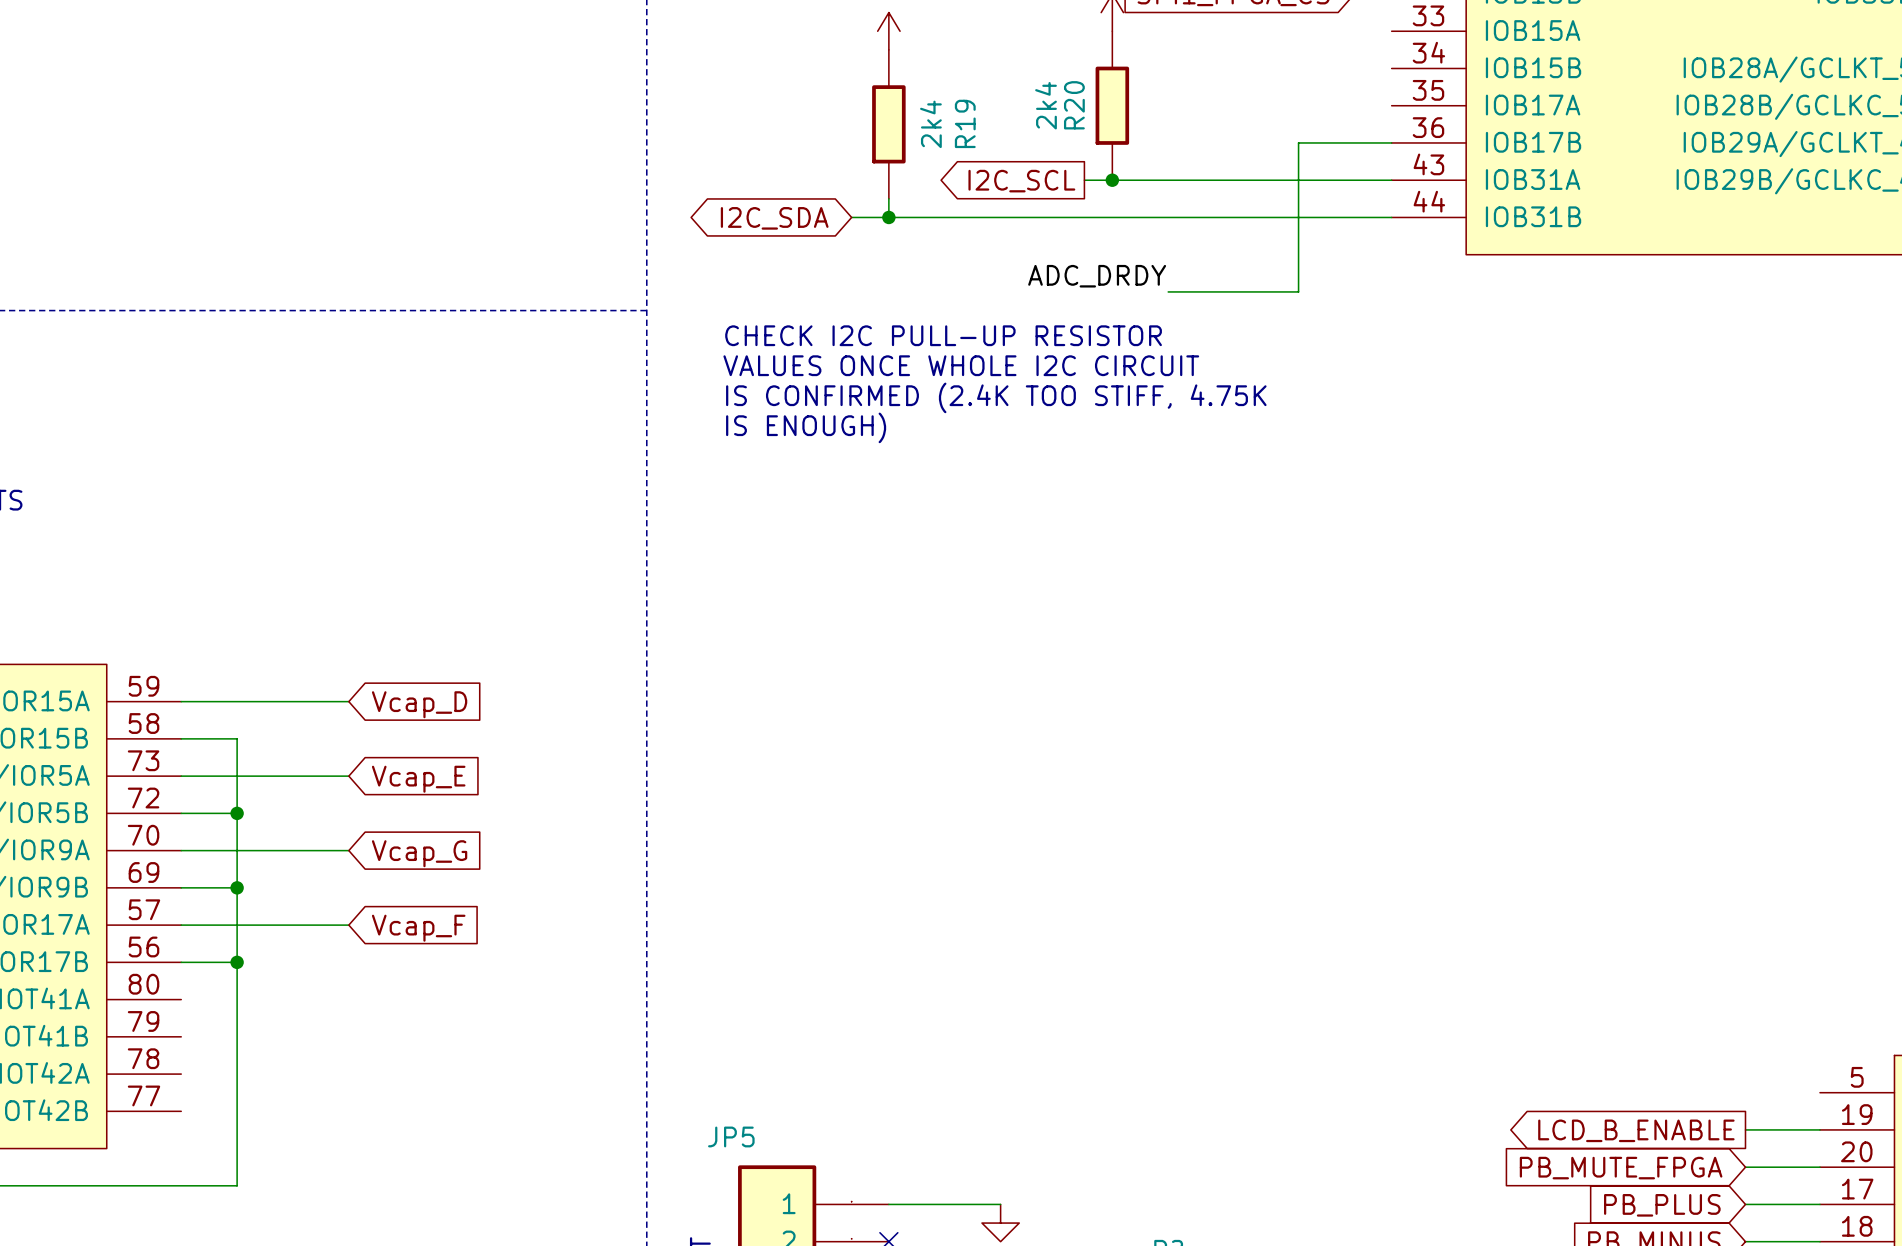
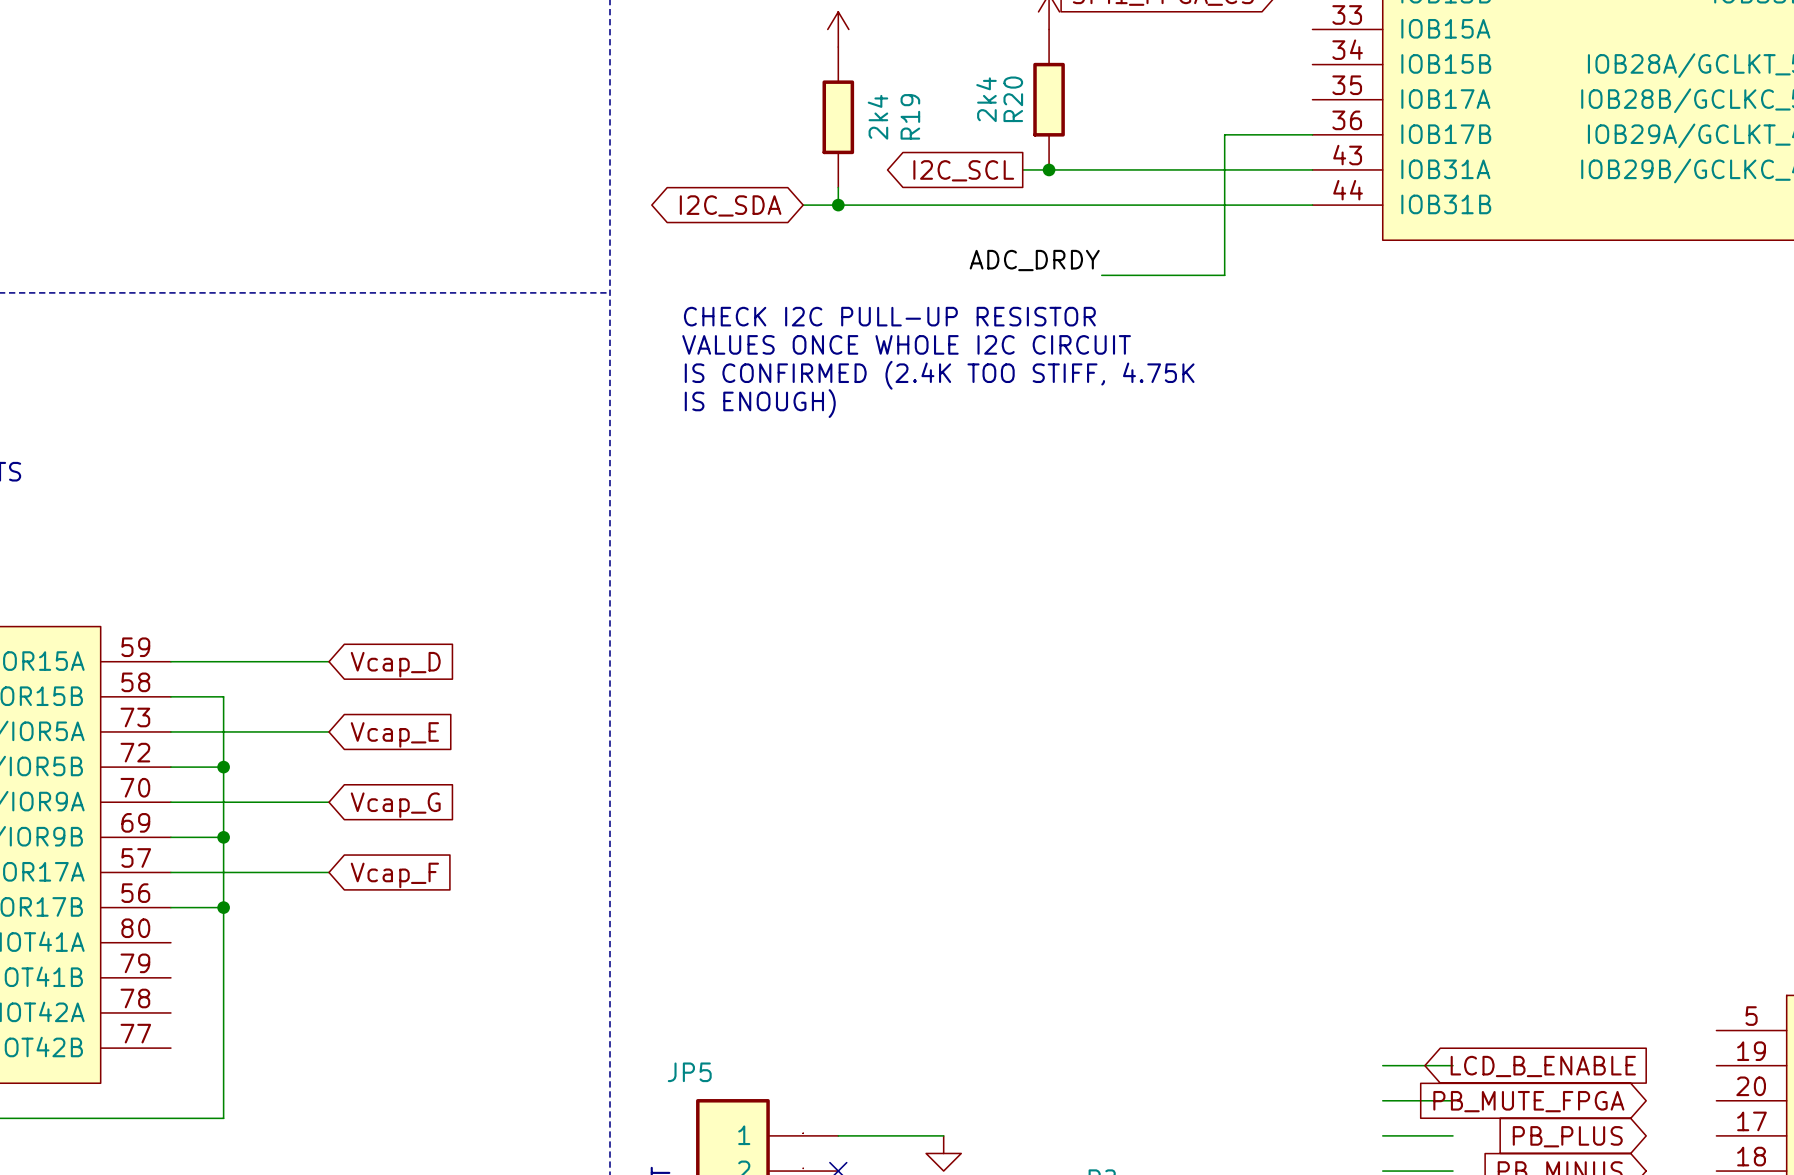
wire: (1745, 1129) (1819, 1129) -> (1382, 1065) (1453, 1065)
wire: (1745, 1167) (1819, 1167) -> (1382, 1100) (1453, 1100)
wire: (1745, 1204) (1819, 1204) -> (1382, 1135) (1453, 1135)
wire: (1745, 1241) (1819, 1241) -> (1382, 1171) (1453, 1171)

